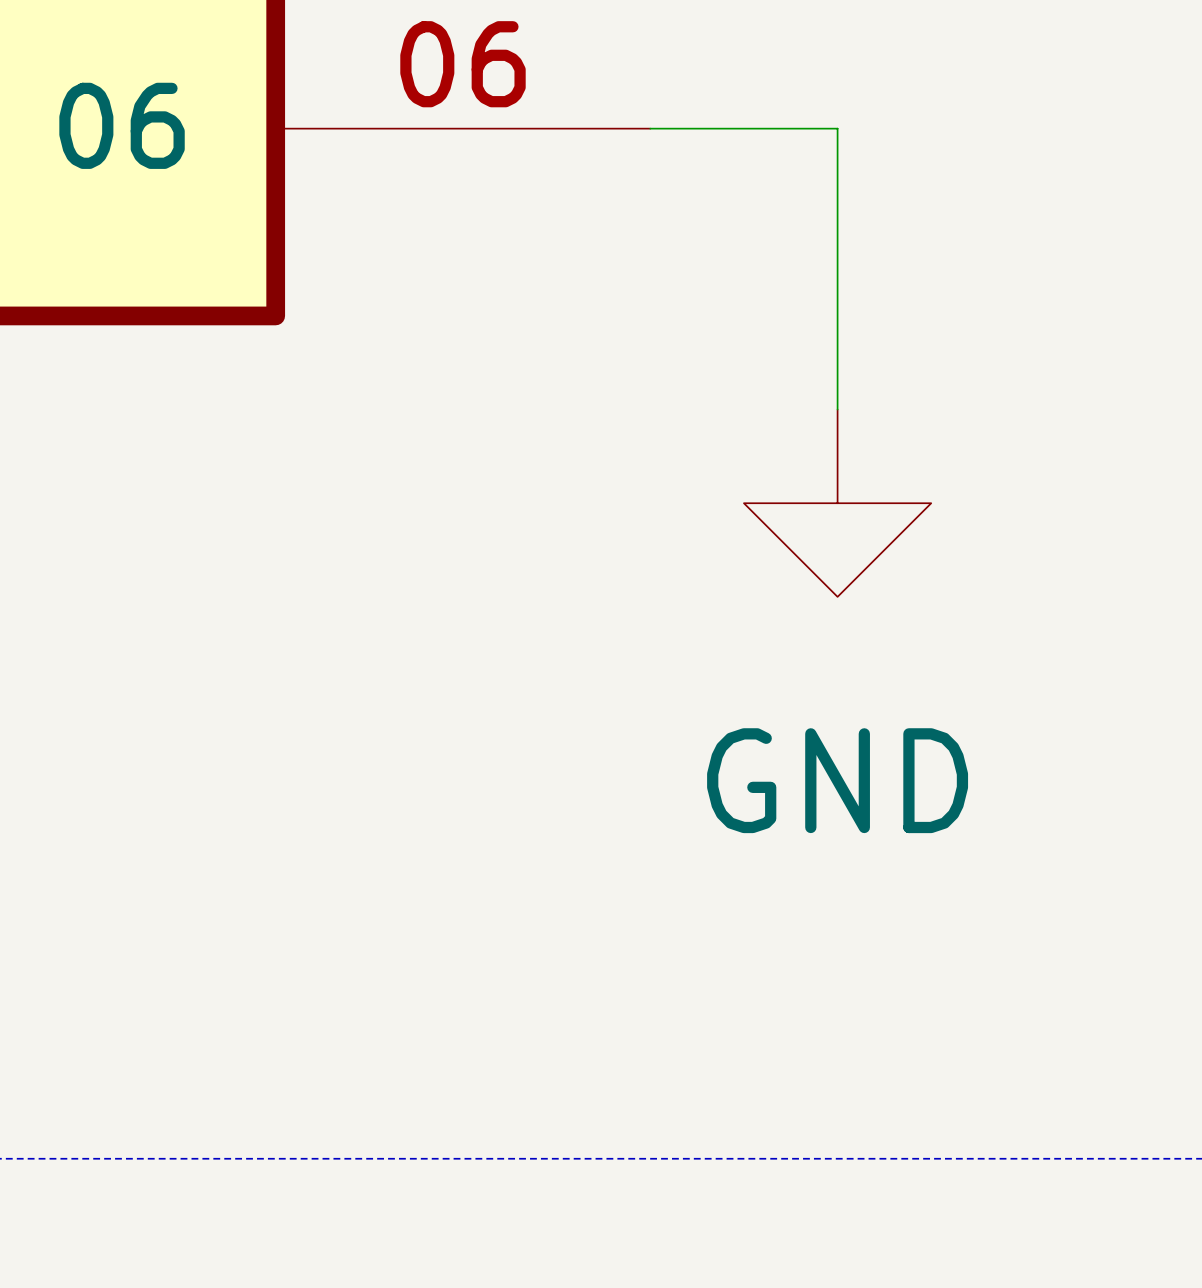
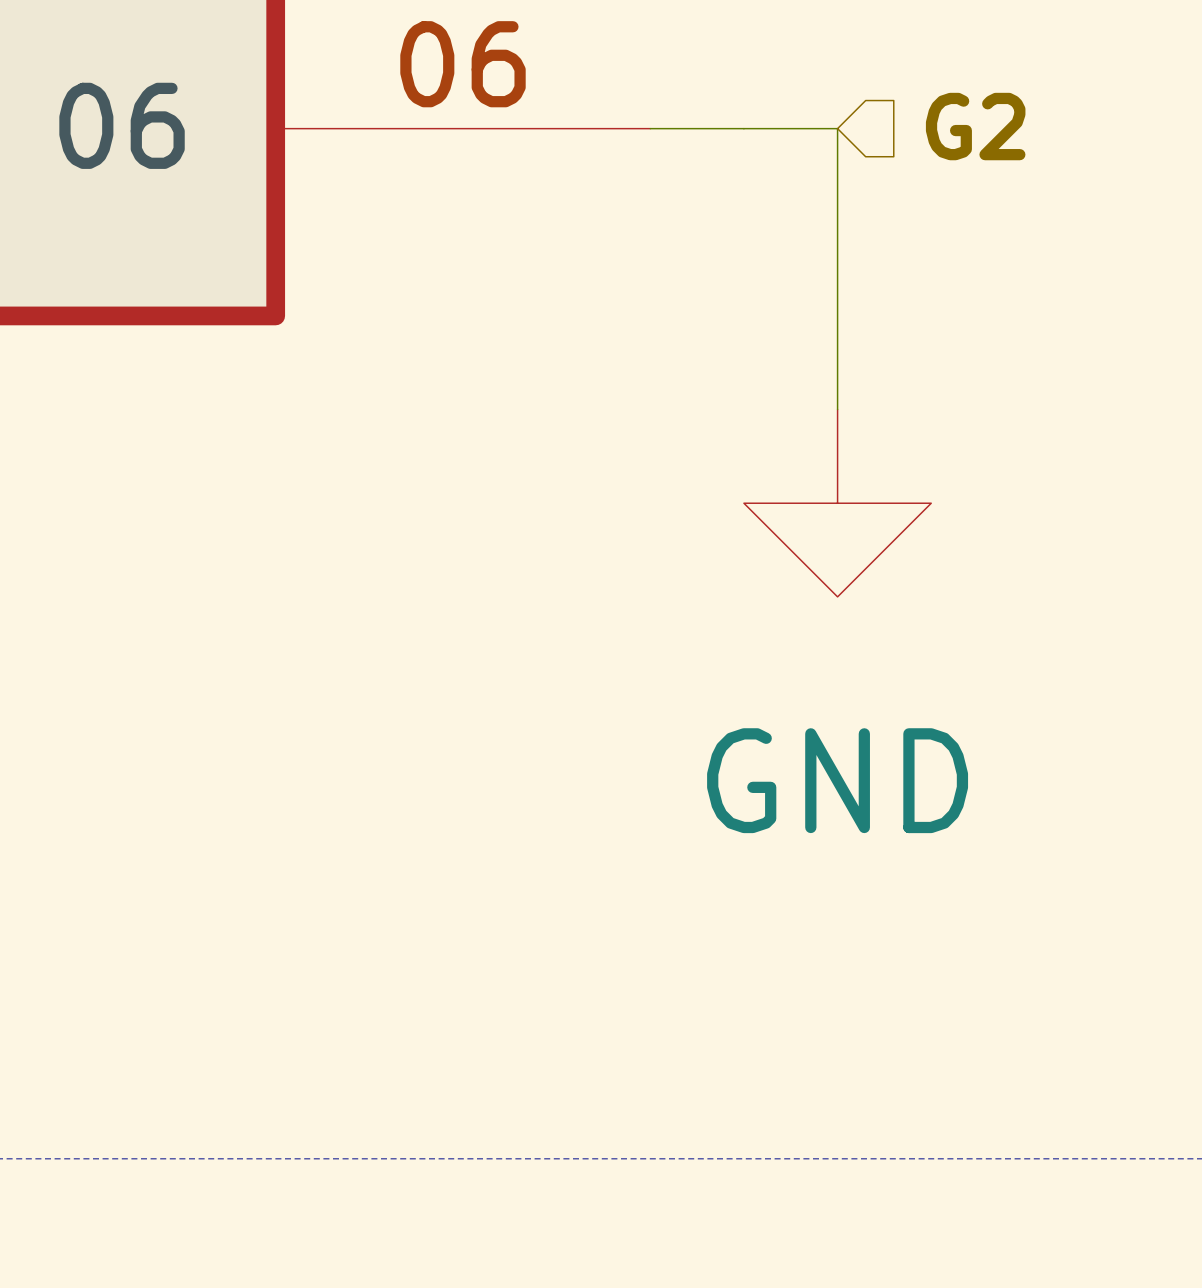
hierarchical label: none -> G2 (975, 126)

